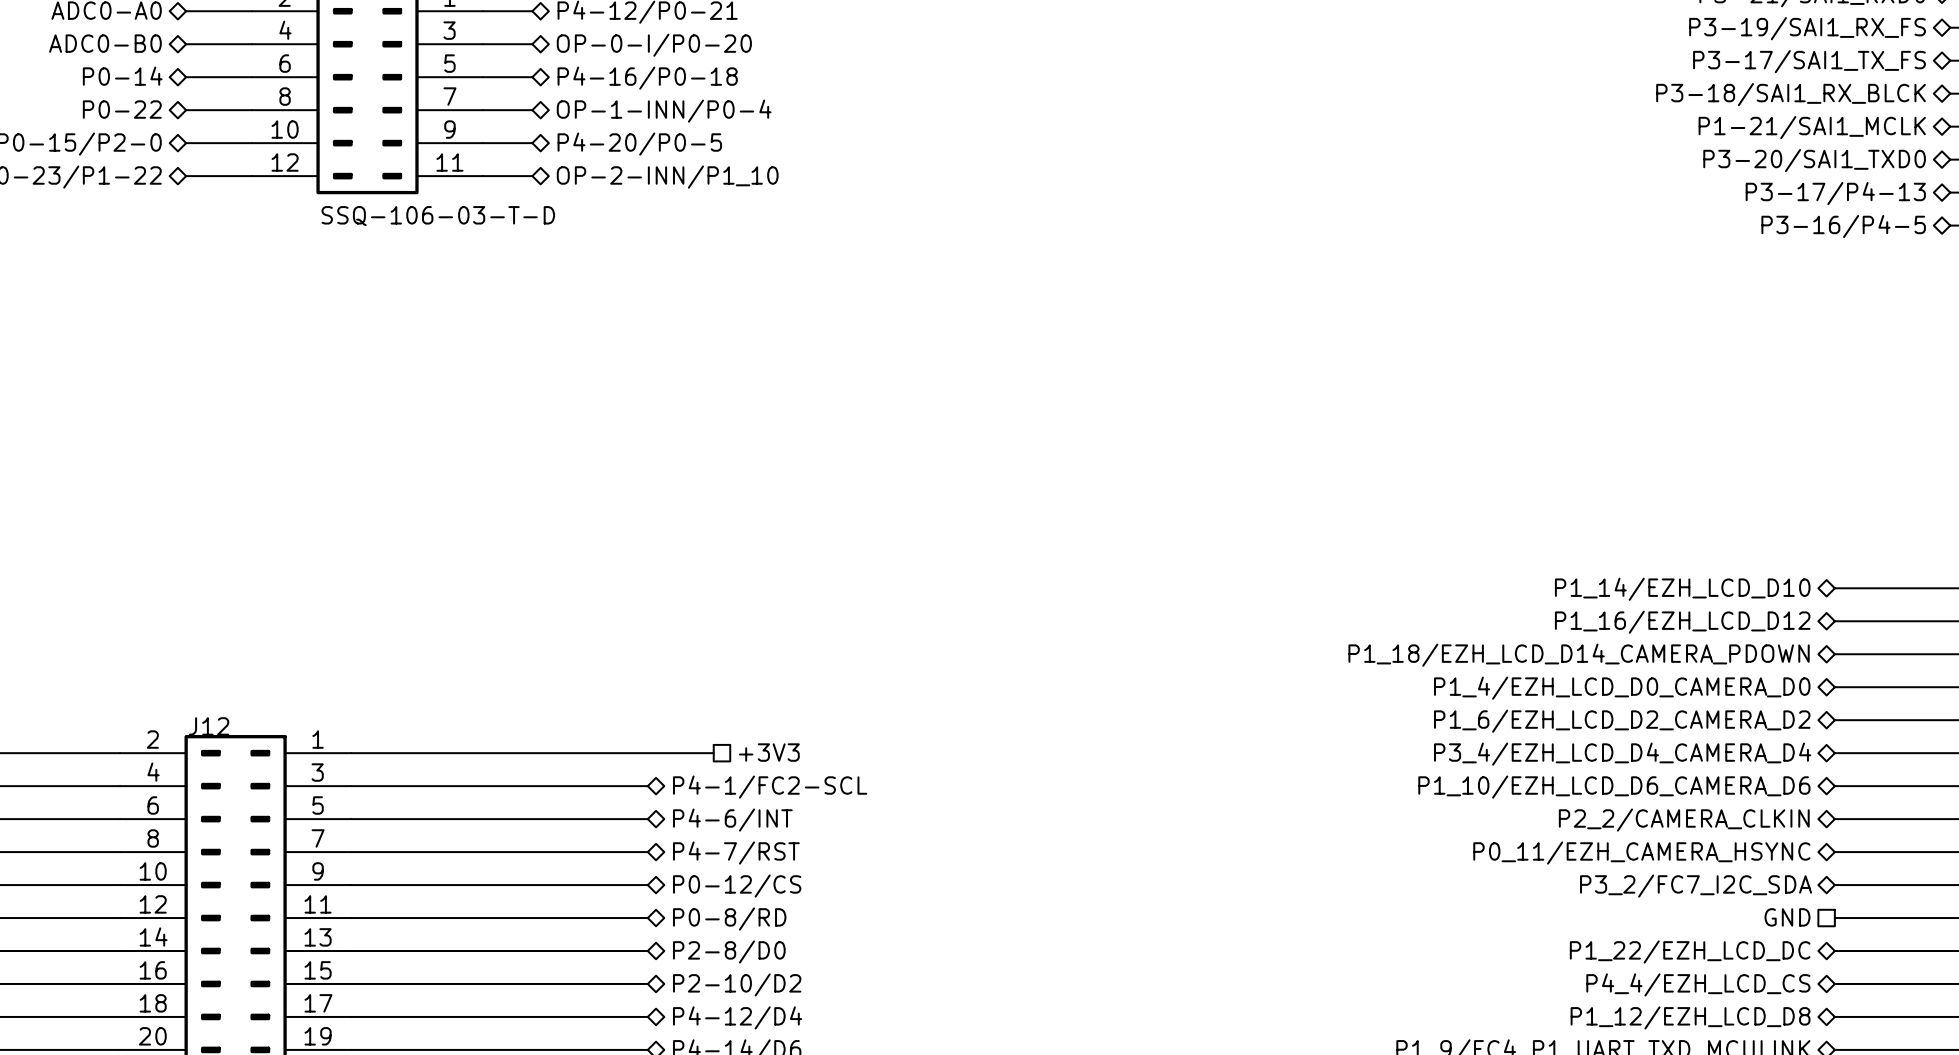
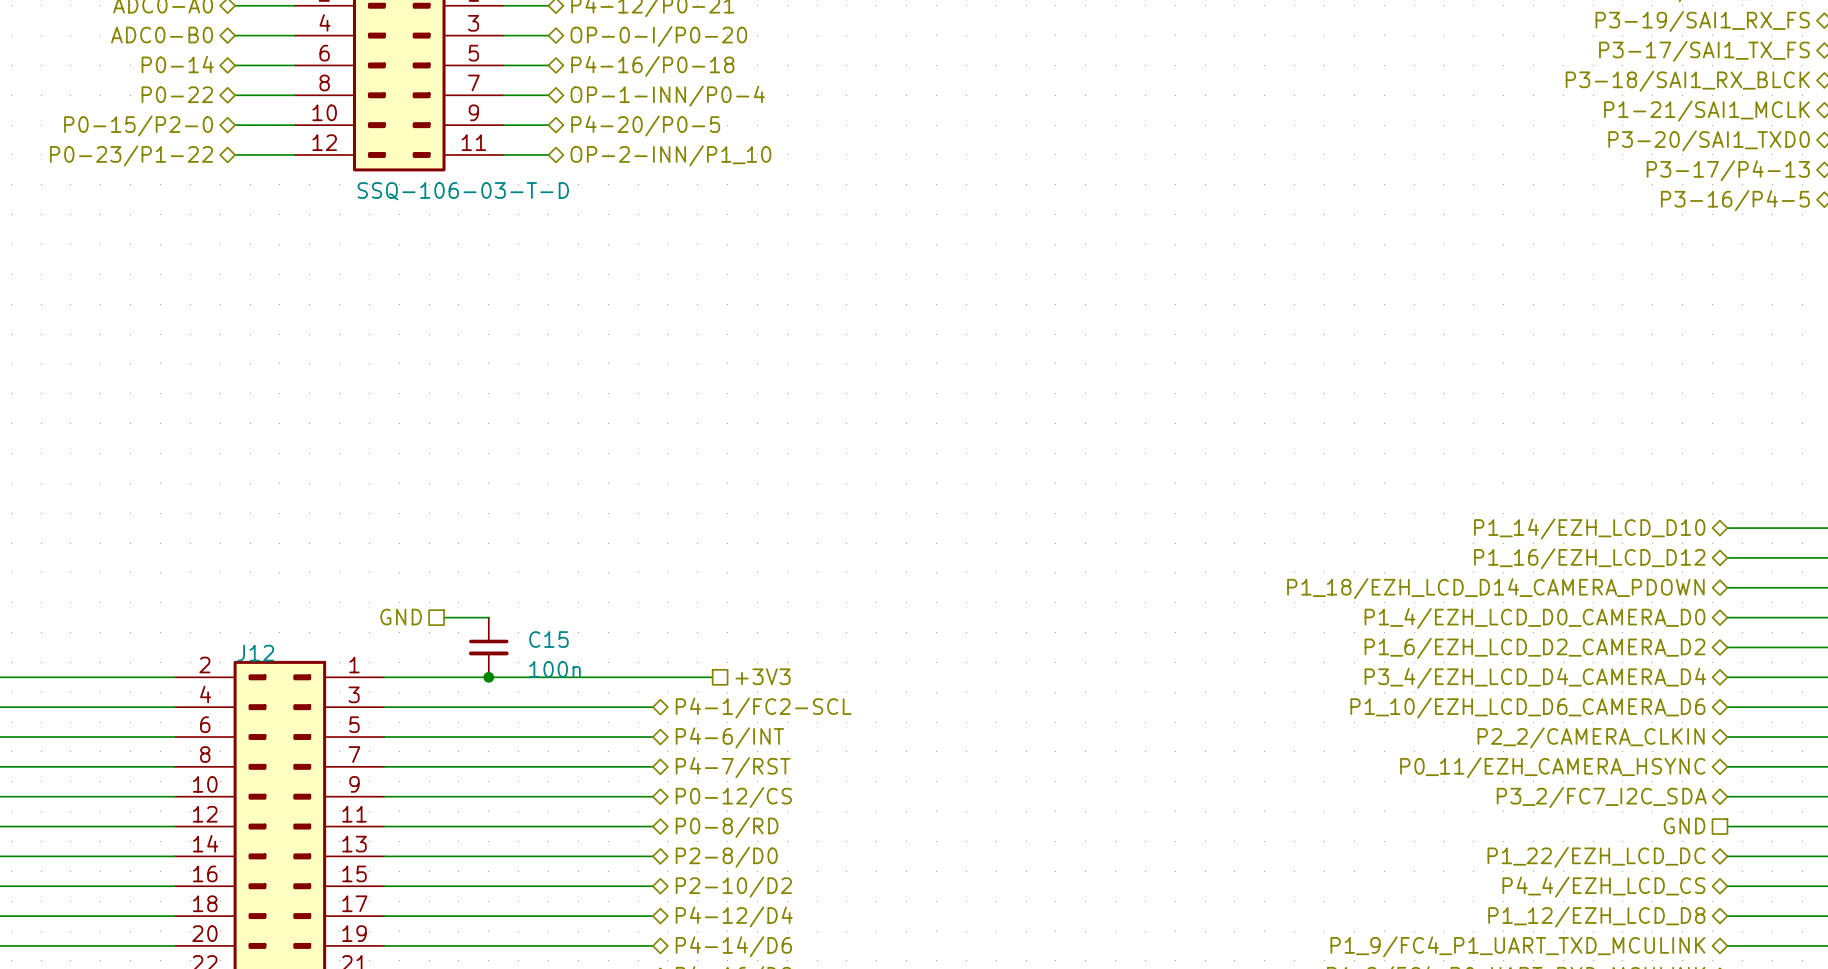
hierarchical label: none -> GND (401, 617)
wire: none -> (444, 617) (488, 617)
C15: none -> 100n (488, 647)
junction: none -> (488, 677)

